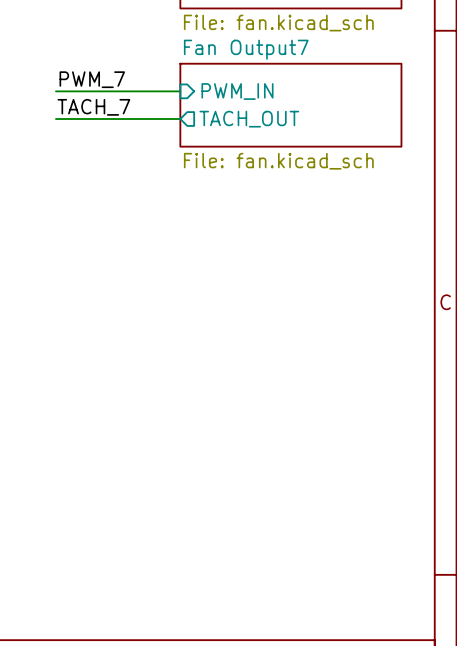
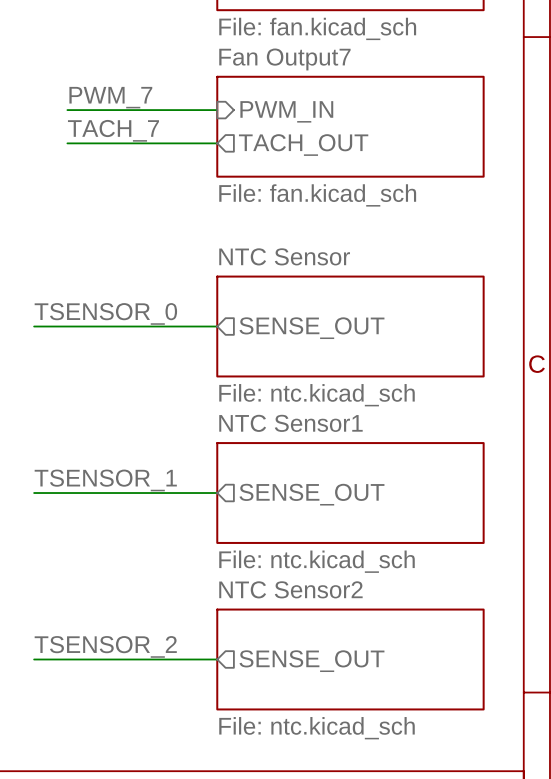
label: none -> TSENSOR_0 (105, 313)
wire: none -> (34, 326) (217, 326)
sheet pin: none -> SENSE_OUT (311, 328)
sheet NTC Sensor: none -> File: ntc.kicad_sch (350, 326)
label: none -> TSENSOR_1 (105, 480)
wire: none -> (34, 493) (217, 493)
sheet pin: none -> SENSE_OUT (311, 494)
sheet NTC Sensor1: none -> File: ntc.kicad_sch (350, 493)
label: none -> TSENSOR_2 (105, 646)
wire: none -> (34, 659) (217, 659)
sheet pin: none -> SENSE_OUT (311, 661)
sheet NTC Sensor2: none -> File: ntc.kicad_sch (350, 659)

